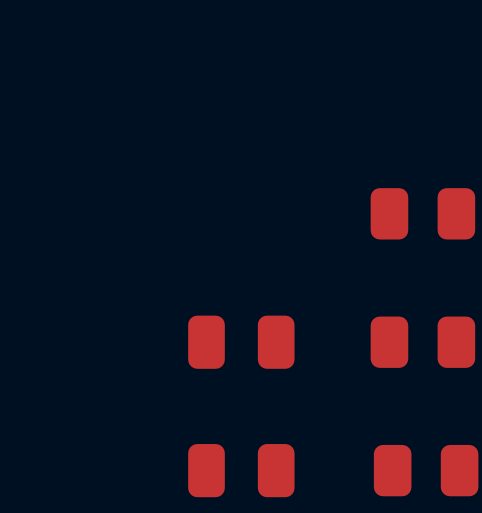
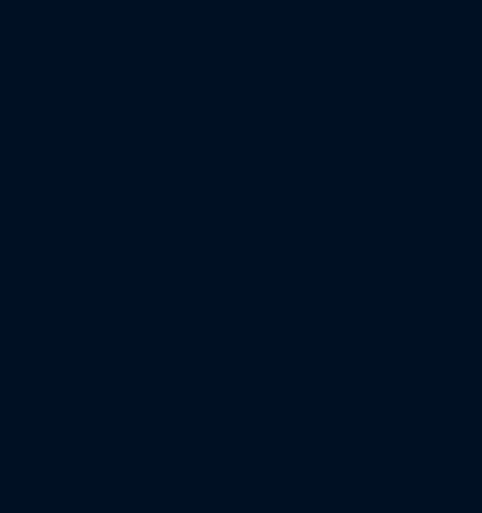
part: (422, 213) -> none
part: (241, 342) -> none
part: (422, 342) -> none
part: (241, 470) -> none
part: (426, 470) -> none

